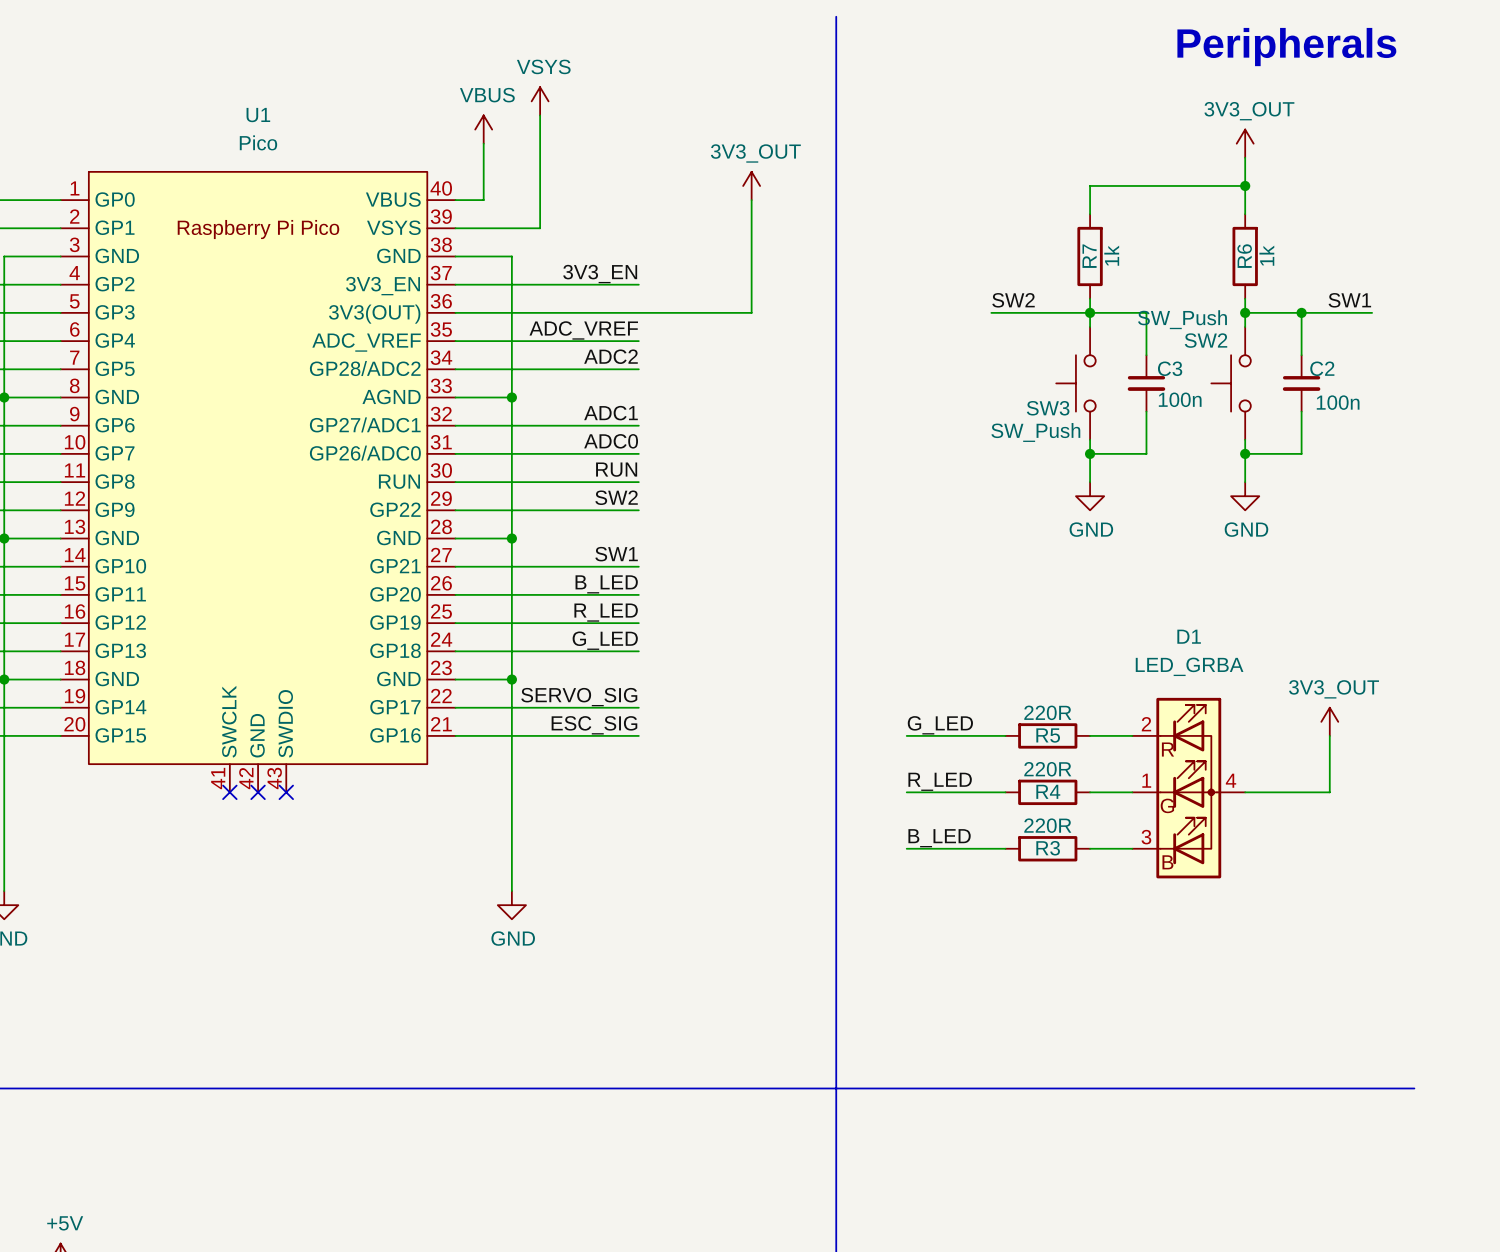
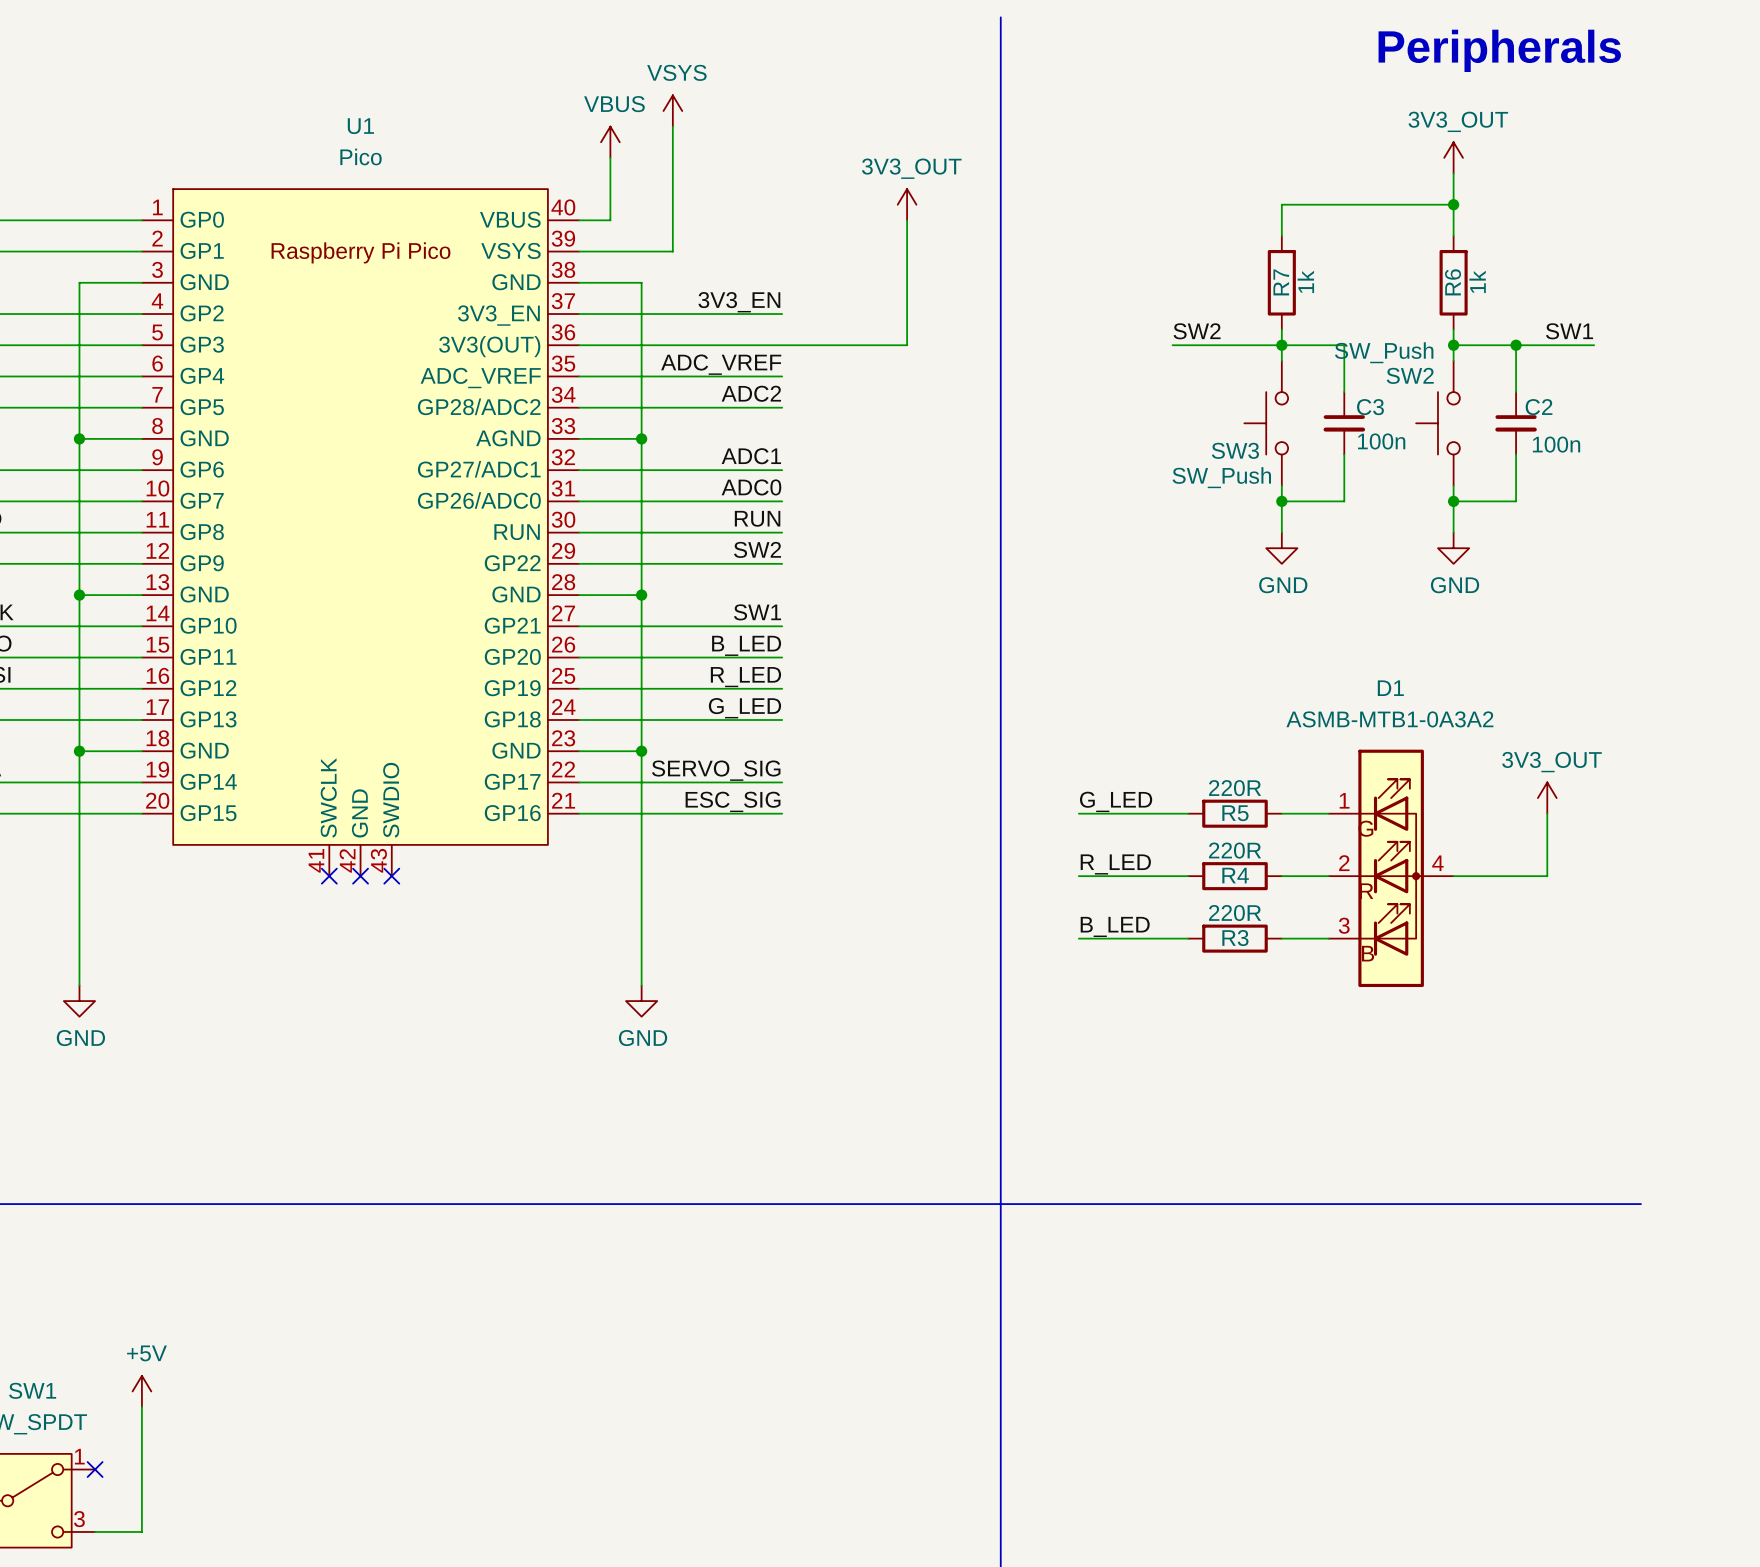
D1 value: LED_GRBA (1189, 666) -> ASMB-MTB1-0A3A2 (1389, 719)
D1 symbol: [1132, 697, 1246, 879] -> [1328, 749, 1454, 988]

